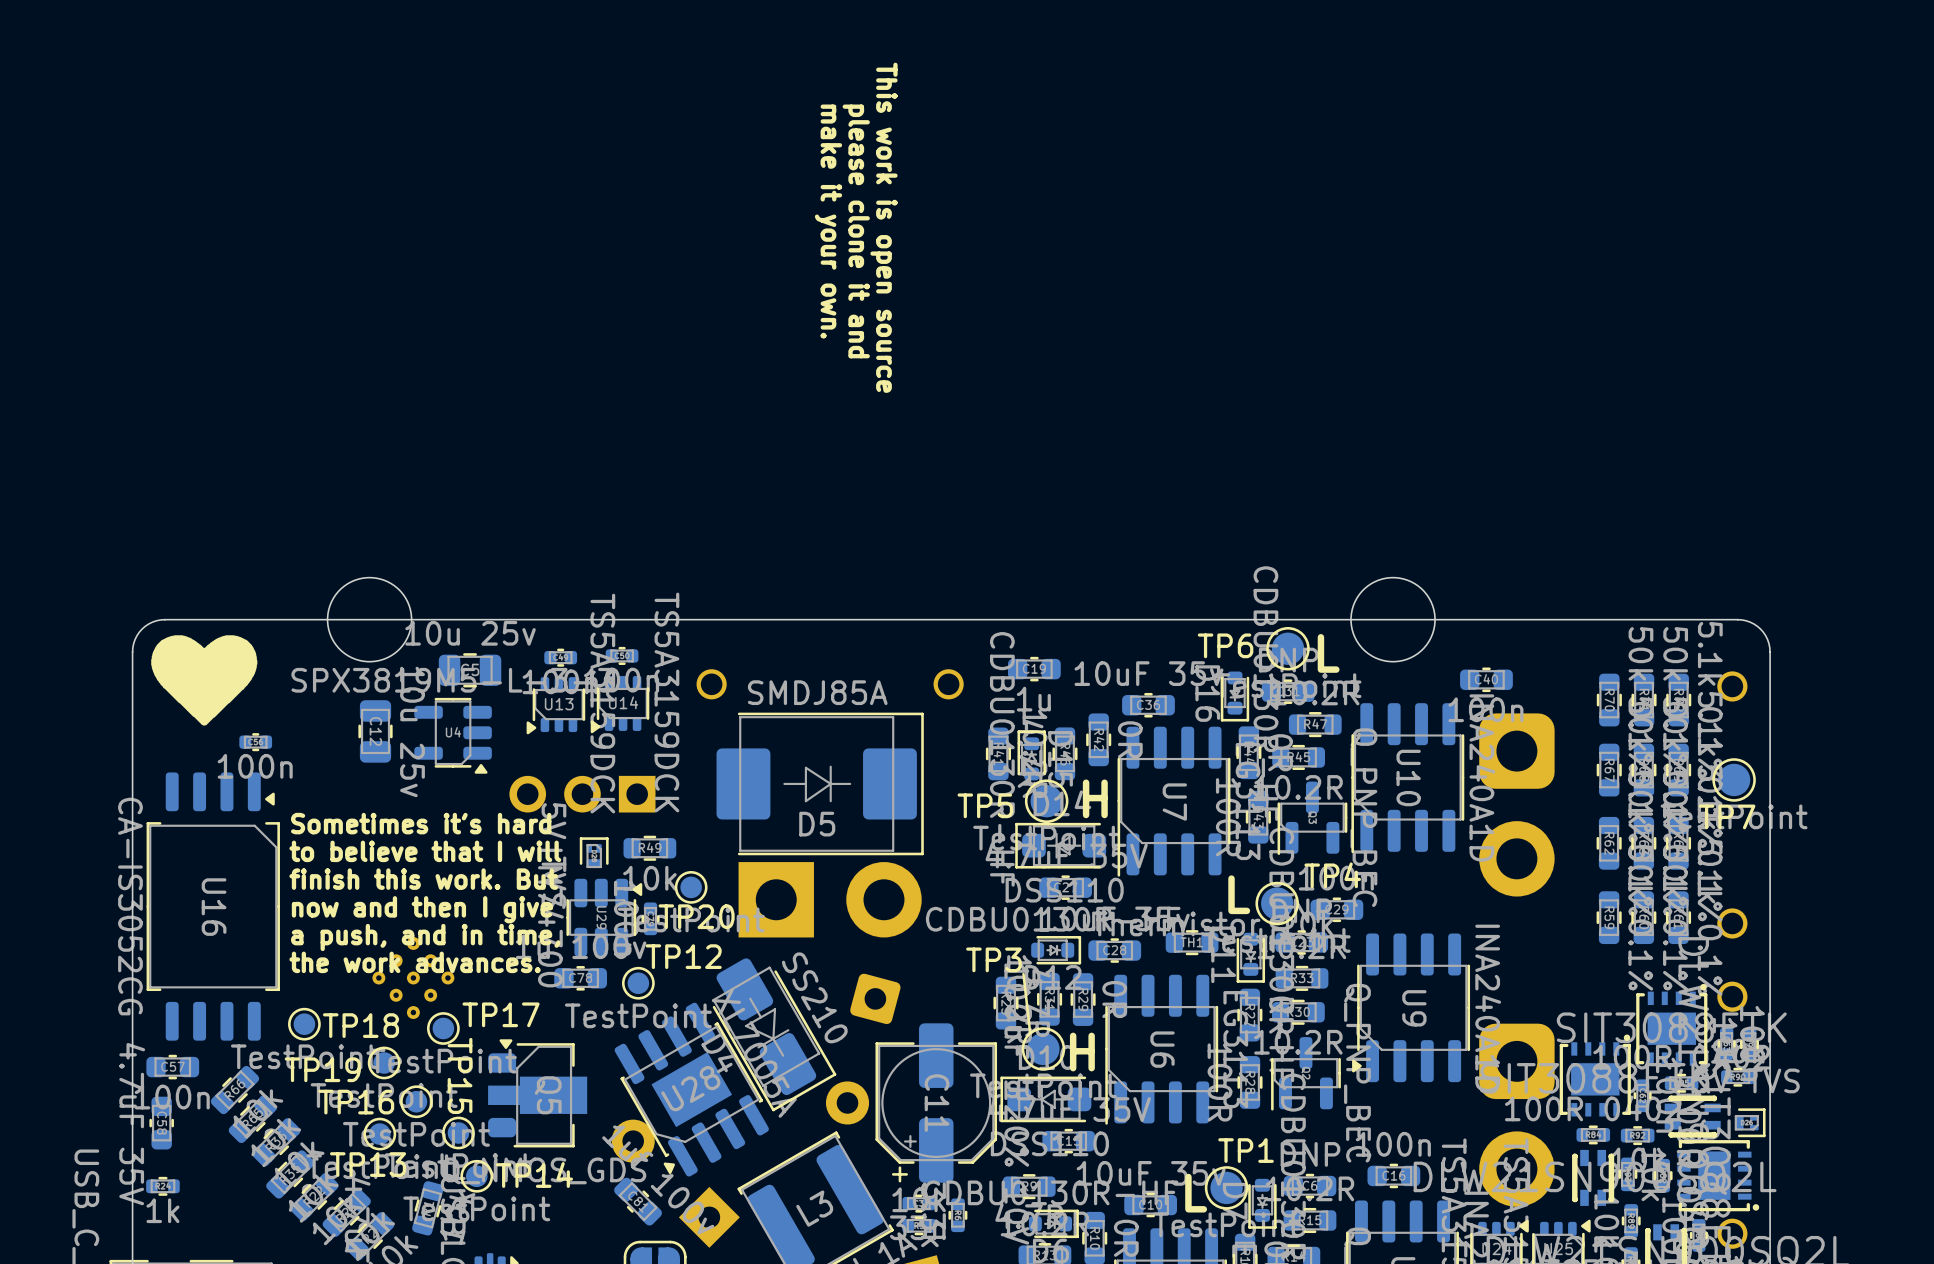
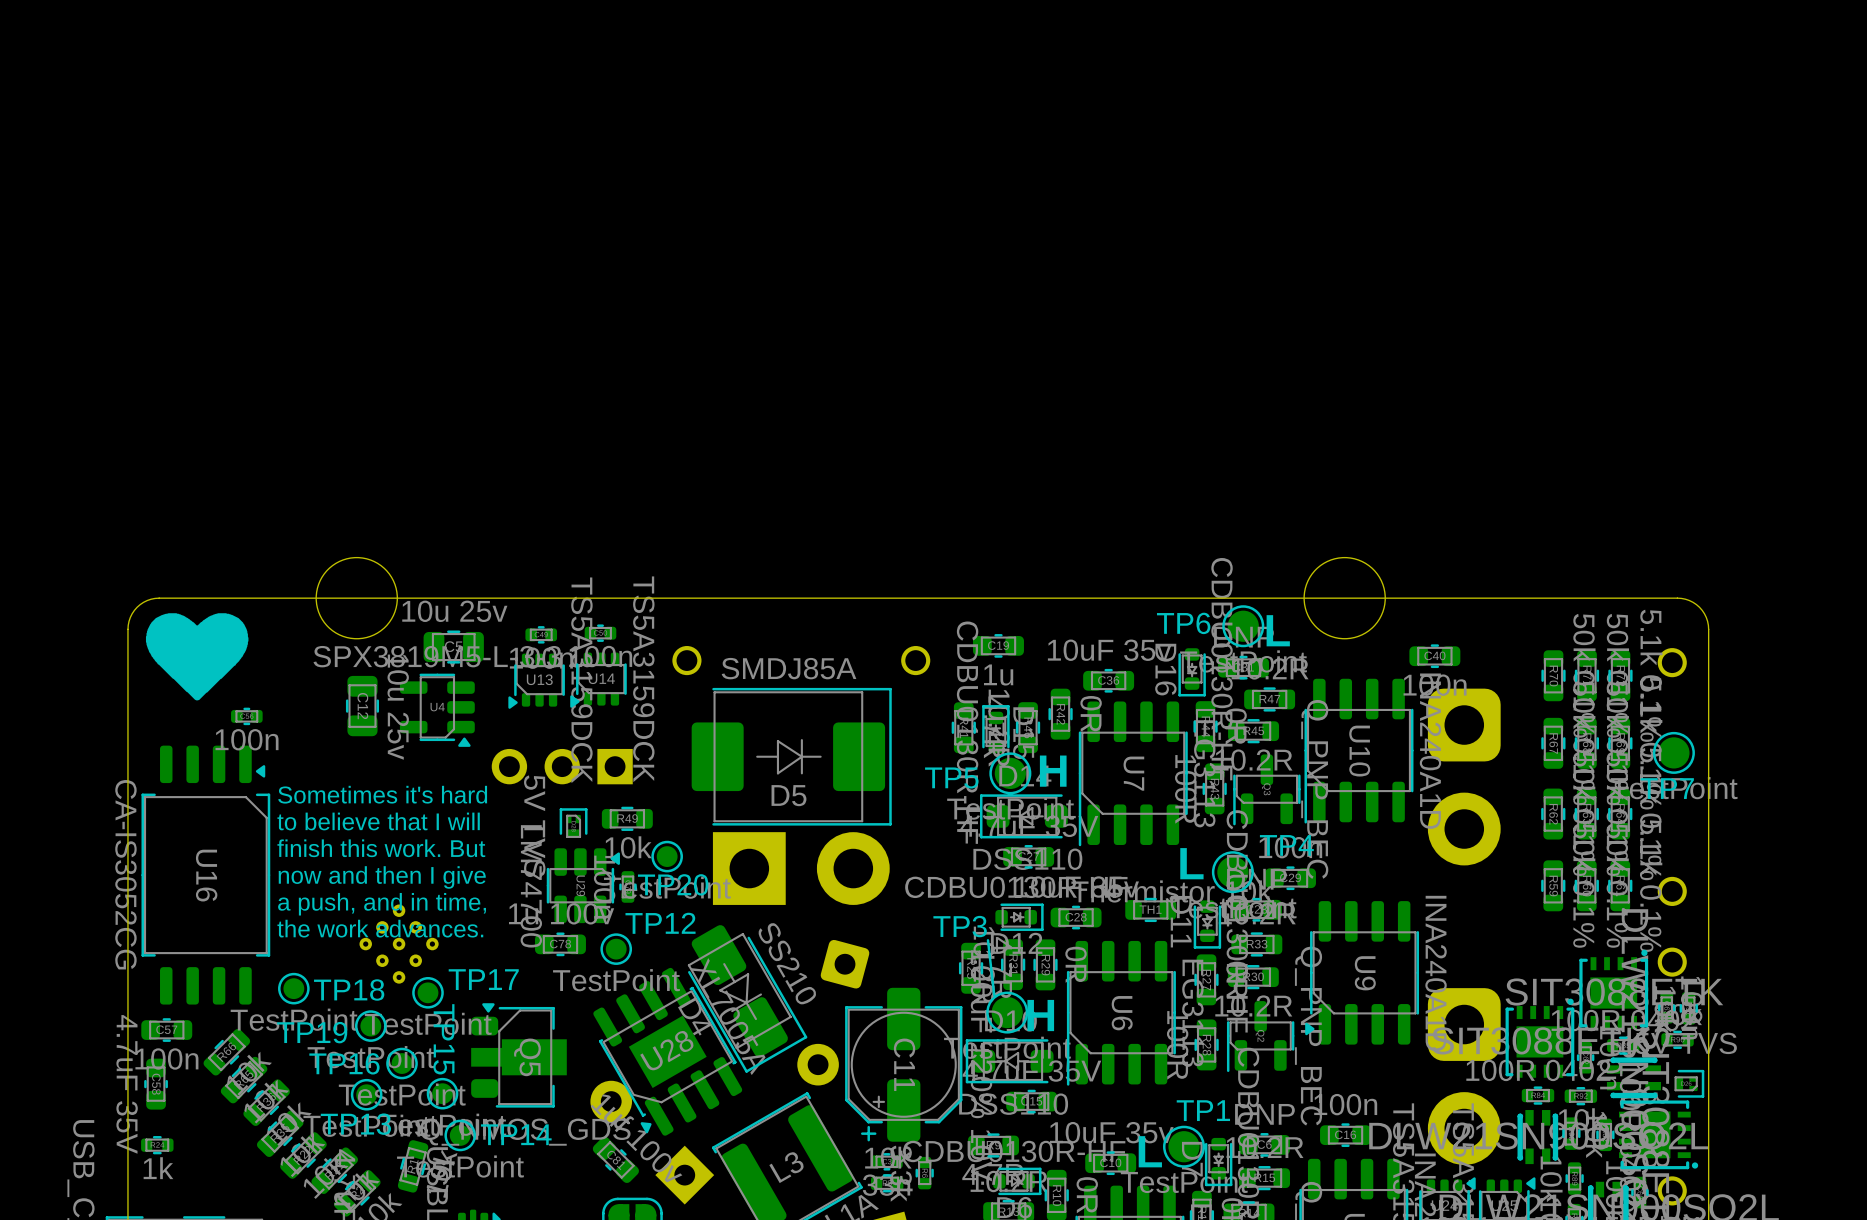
text: make it your own. (828, 221) -> none
text: This work is open source (883, 227) -> none
text: please clone it and (856, 231) -> none

